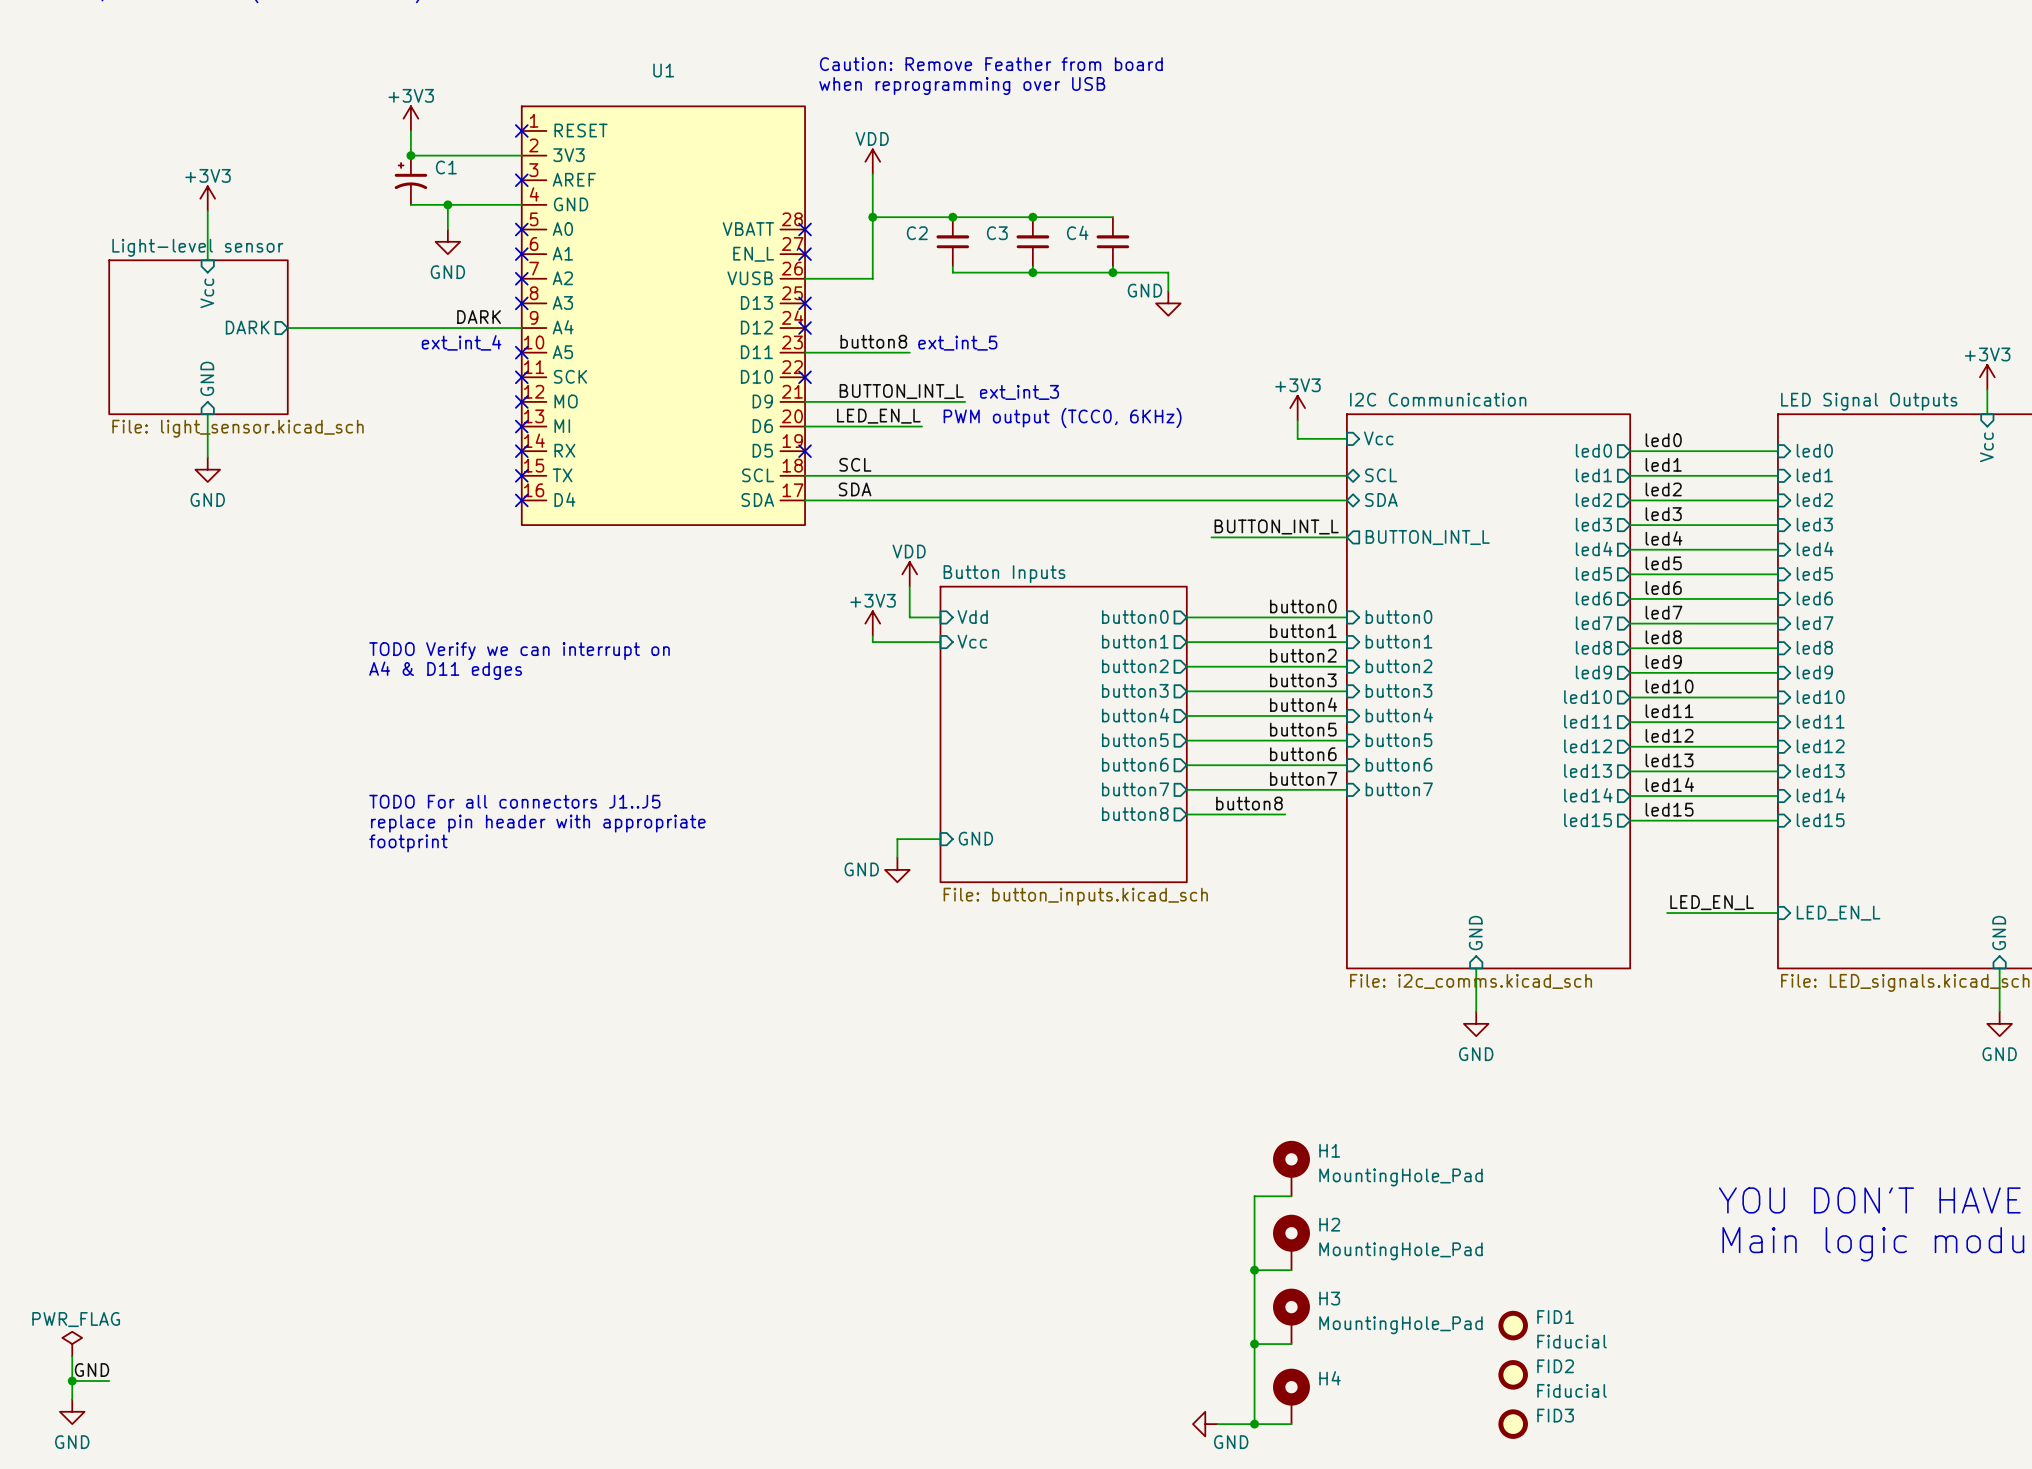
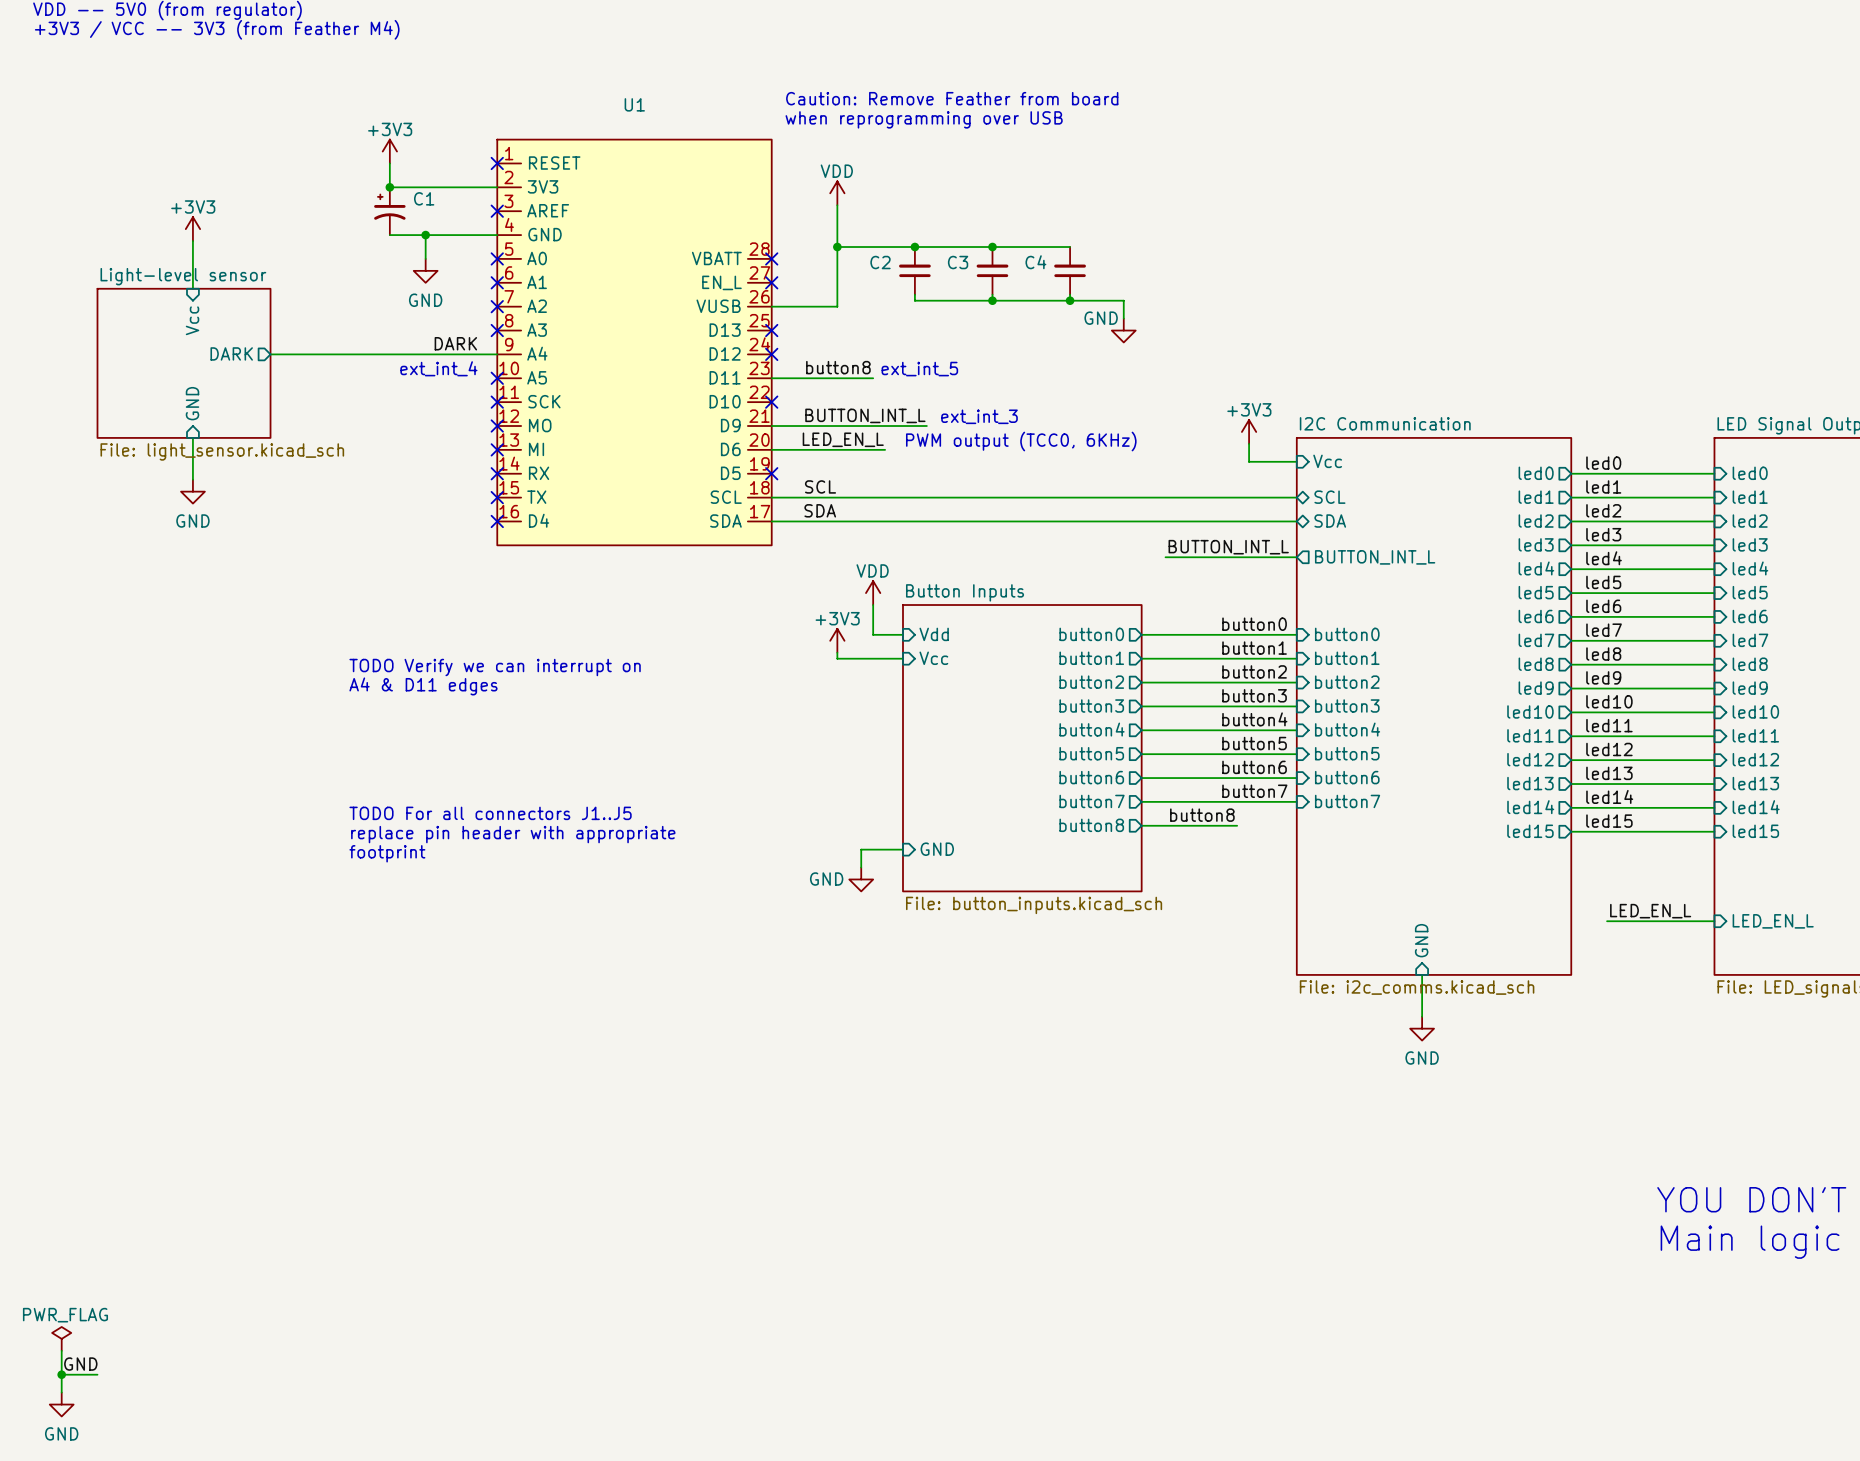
H1: MountingHole_Pad (1291, 1168) -> none
wire: (1291, 1196) (1254, 1196) (1254, 1424) -> none
H2: MountingHole_Pad (1291, 1242) -> none
wire: (1254, 1270) (1291, 1270) -> none
junction: (1254, 1270) -> none
H3: MountingHole_Pad (1291, 1316) -> none
FID1: Fiducial (1513, 1325) -> none
wire: (1254, 1344) (1291, 1344) -> none
junction: (1254, 1344) -> none
FID2: Fiducial (1513, 1374) -> none
H4: (1291, 1396) -> none
power symbol: GND (1205, 1424) -> none
wire: (1217, 1424) (1291, 1424) -> none
junction: (1254, 1424) -> none
FID3: (1513, 1424) -> none

